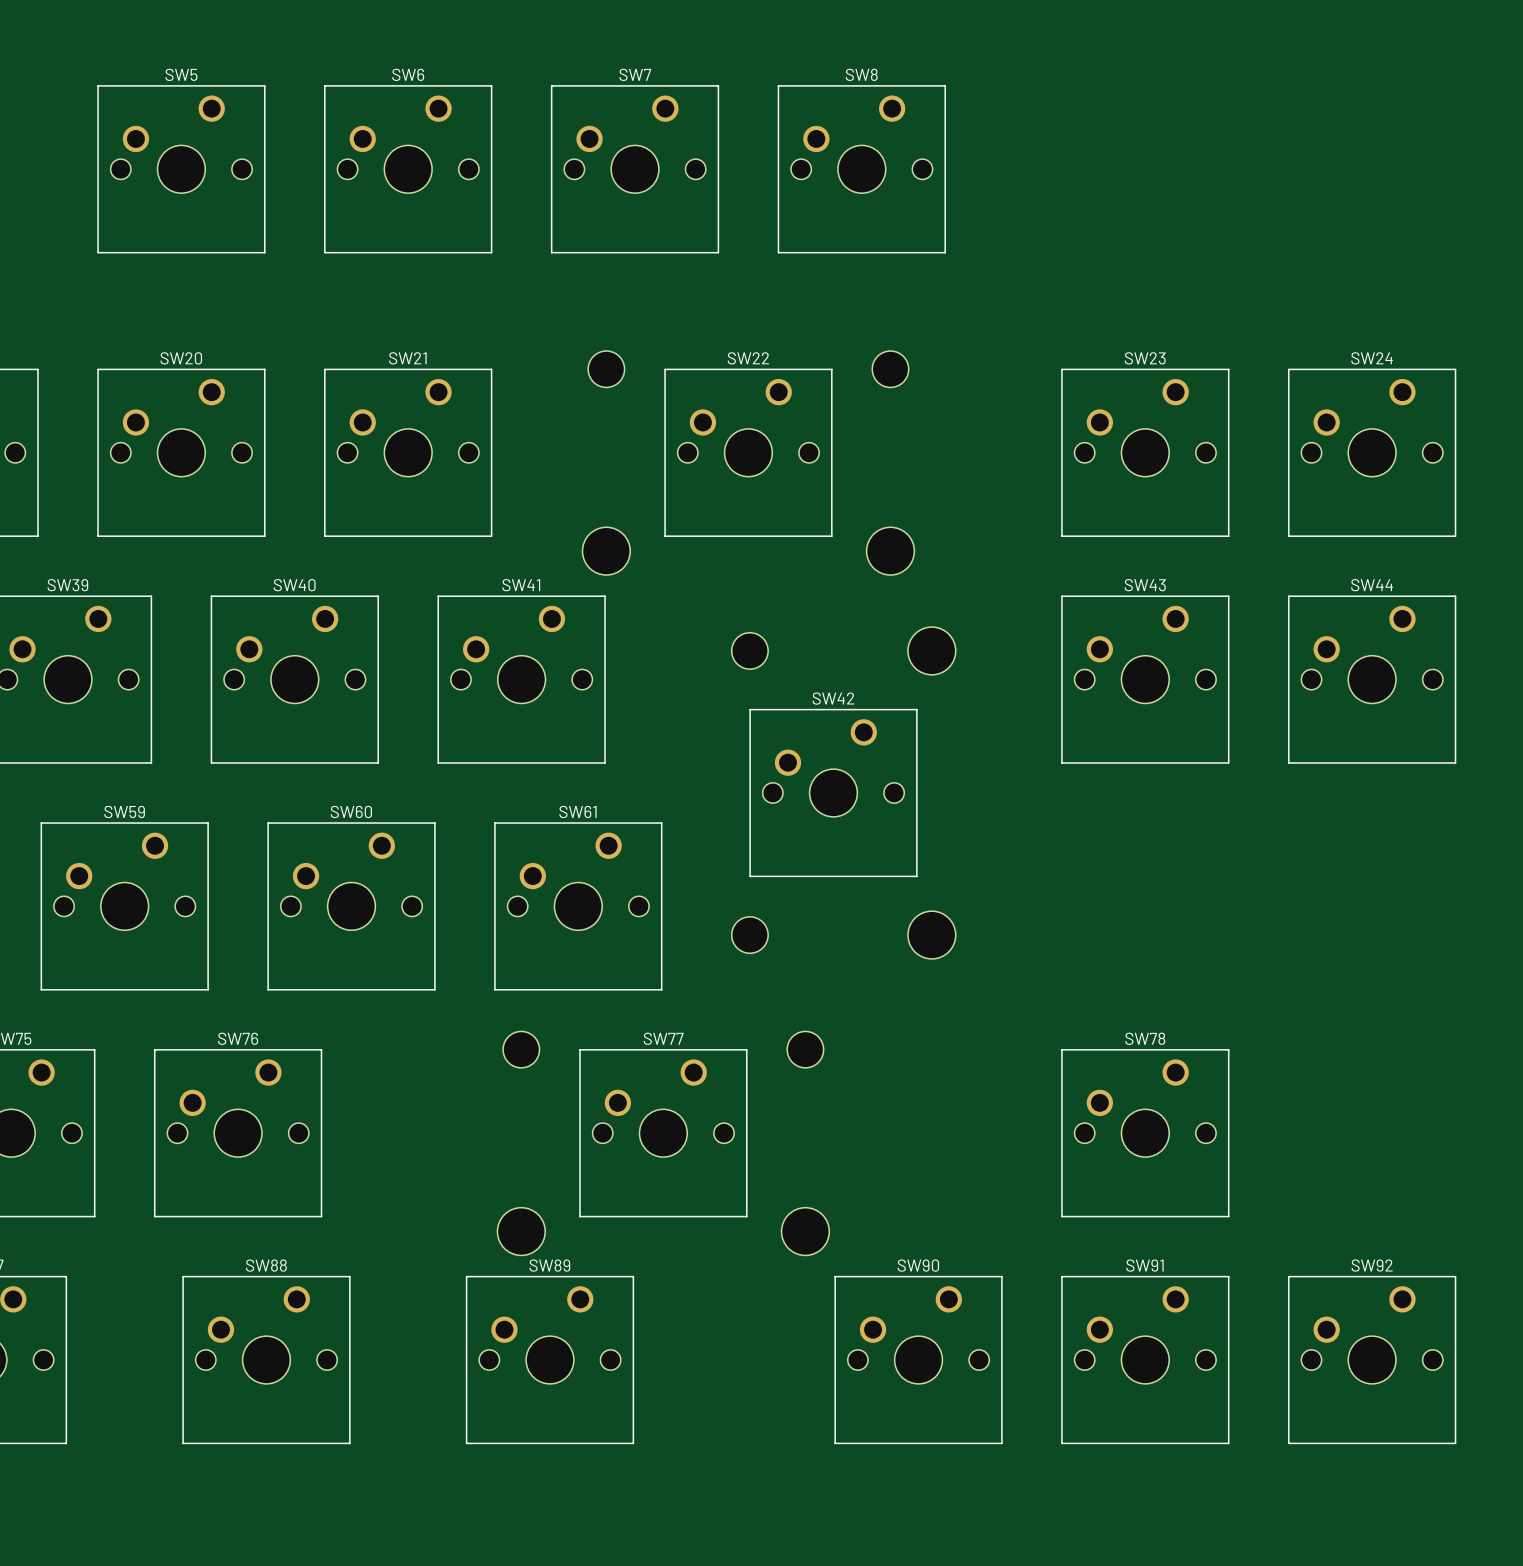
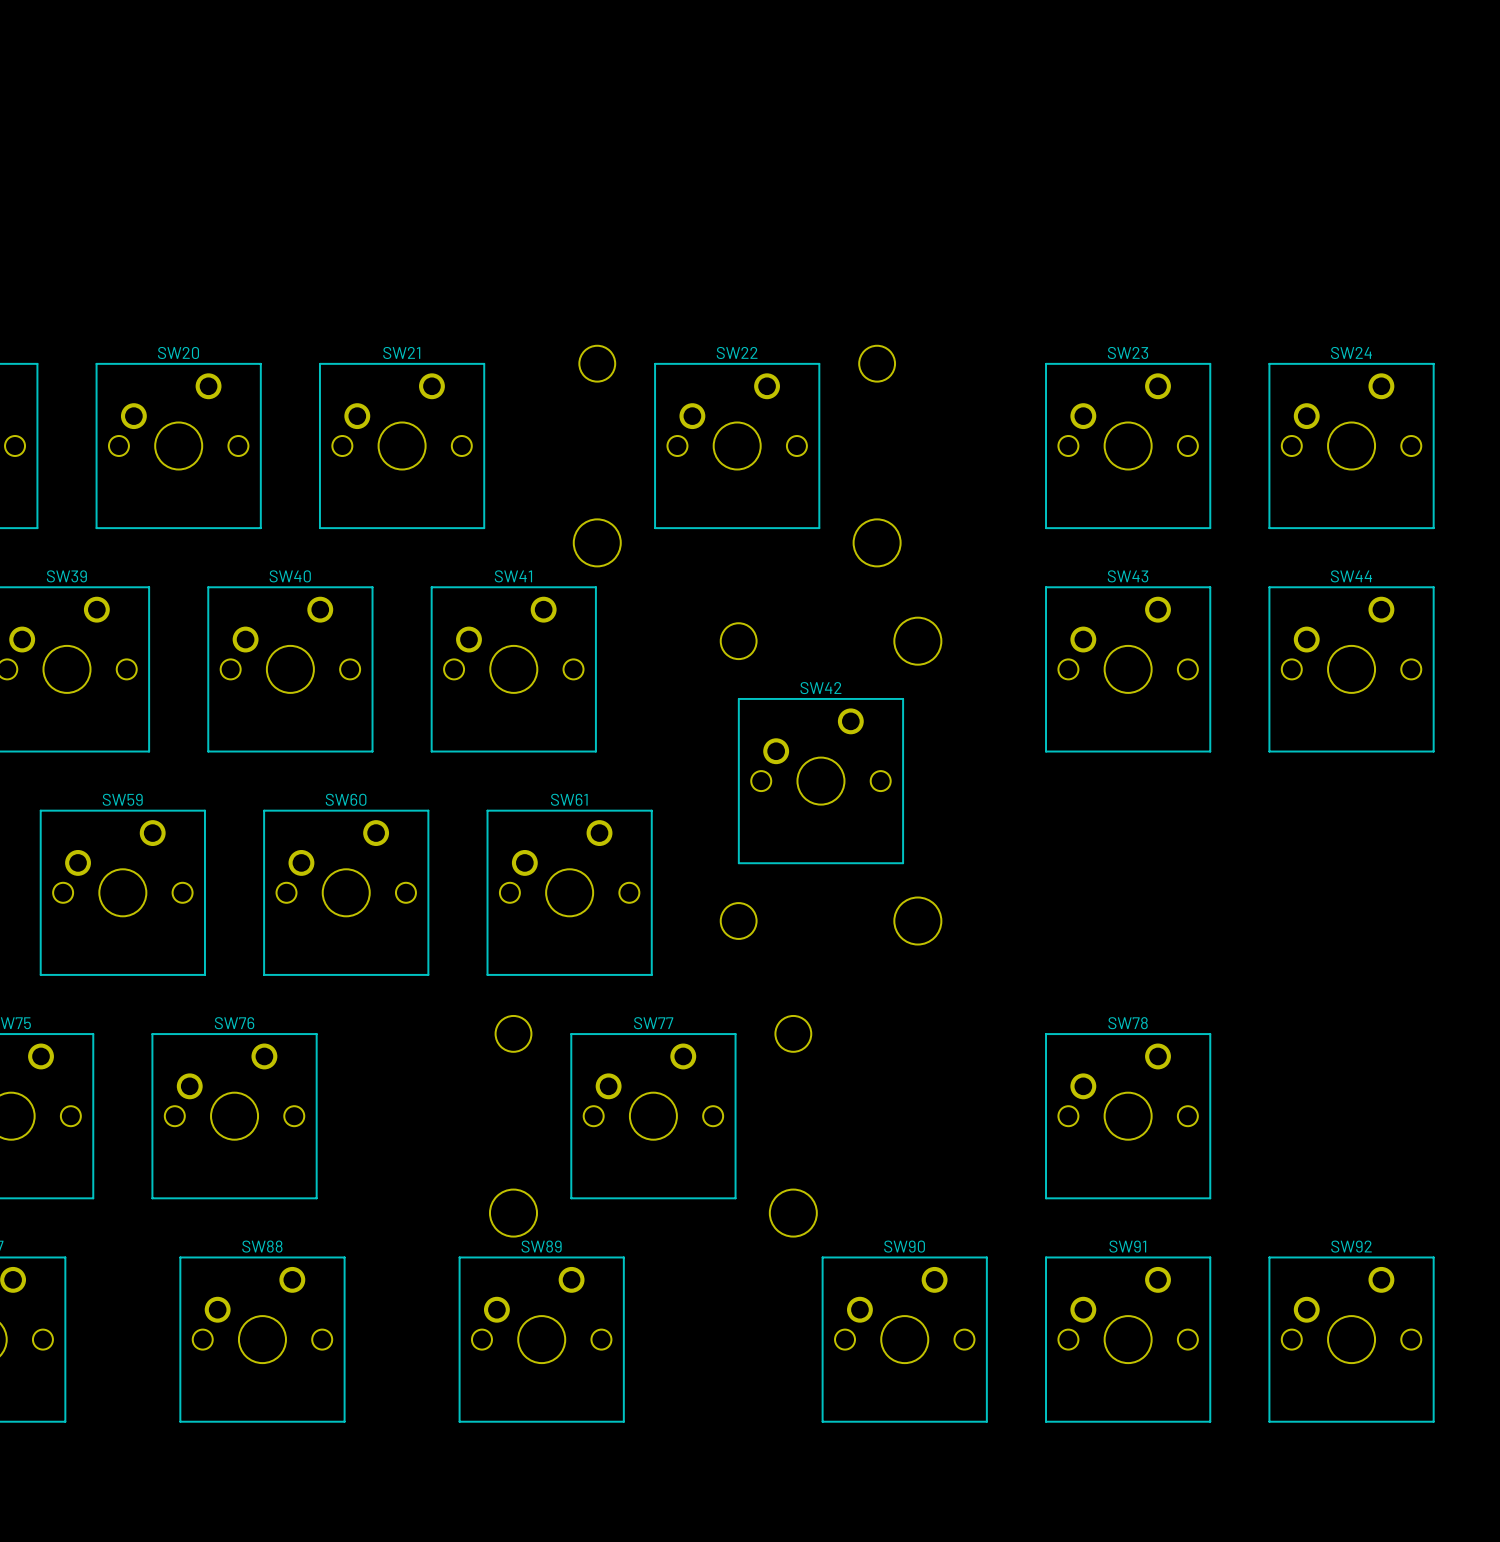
SW5: (181, 169) -> none
SW6: (408, 169) -> none
SW7: (635, 169) -> none
SW8: (861, 169) -> none

